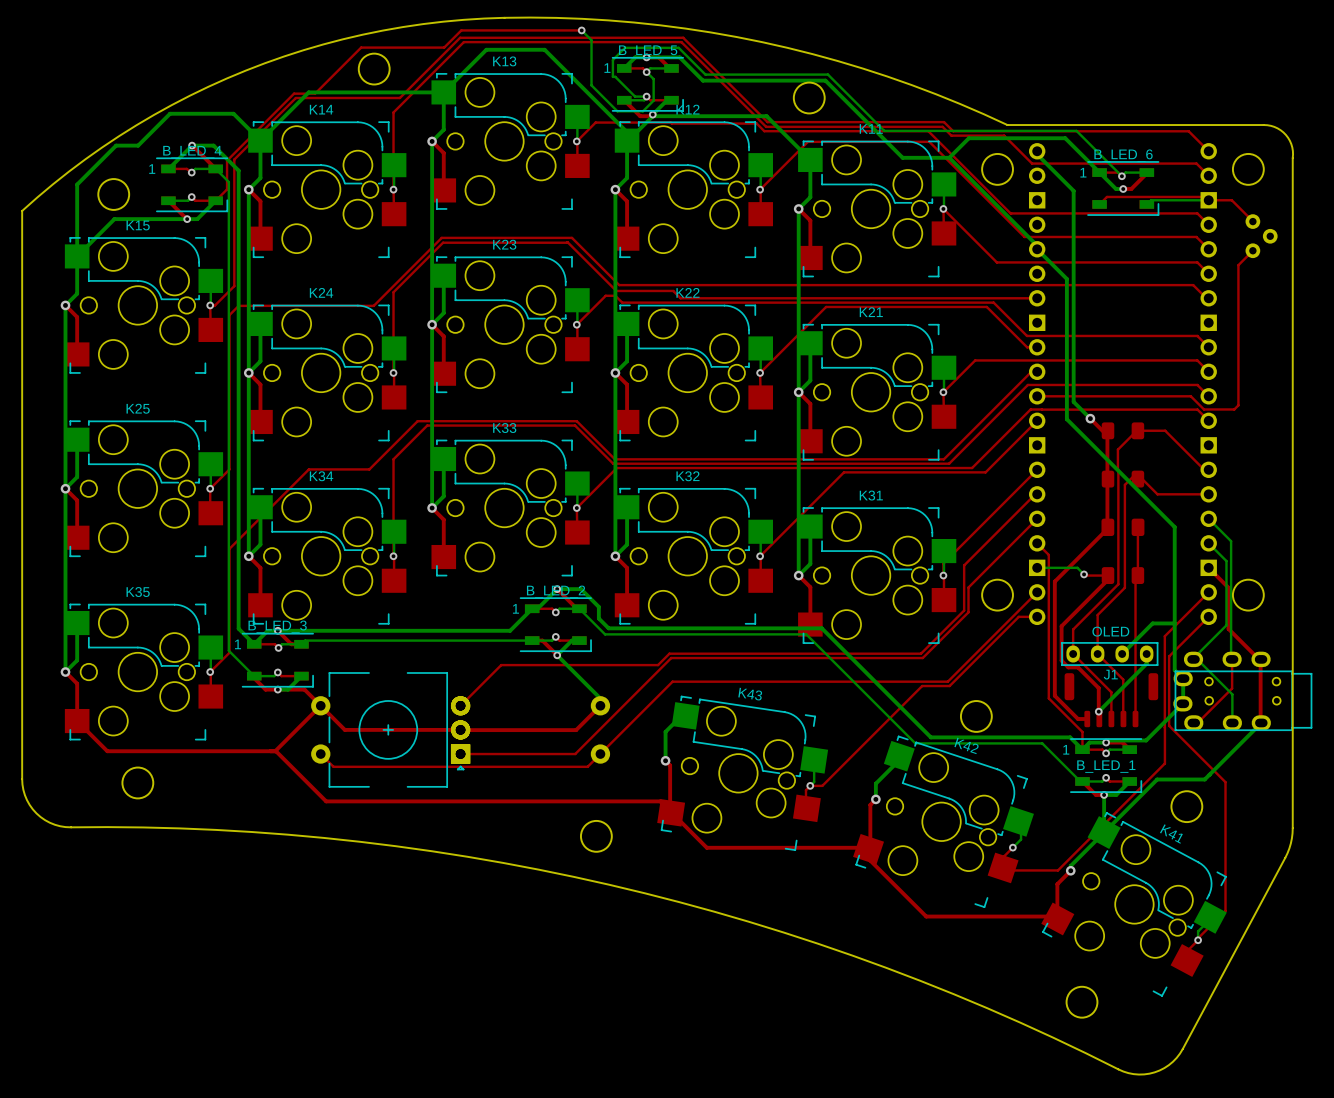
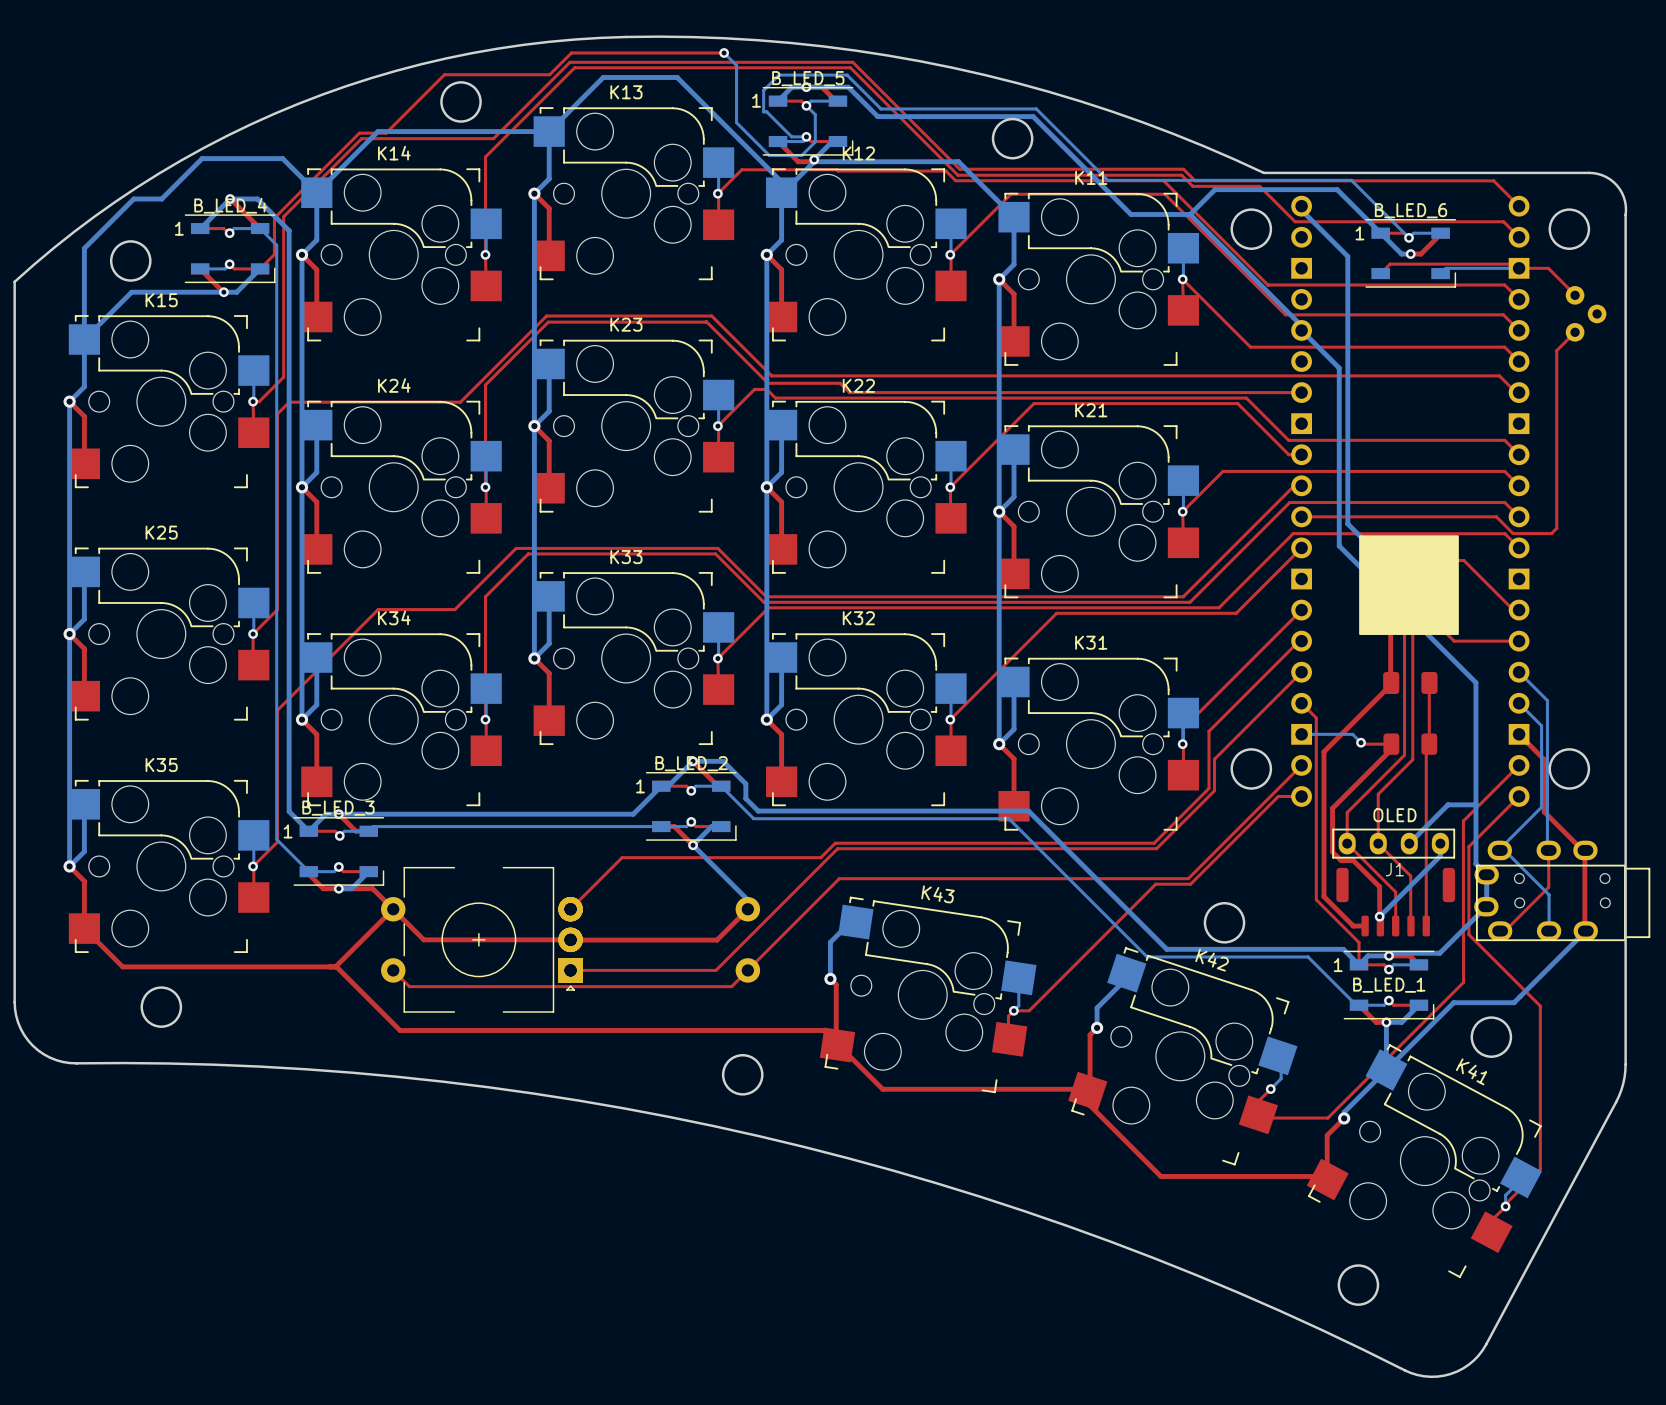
drawing: none -> [1359, 535, 1459, 635]

